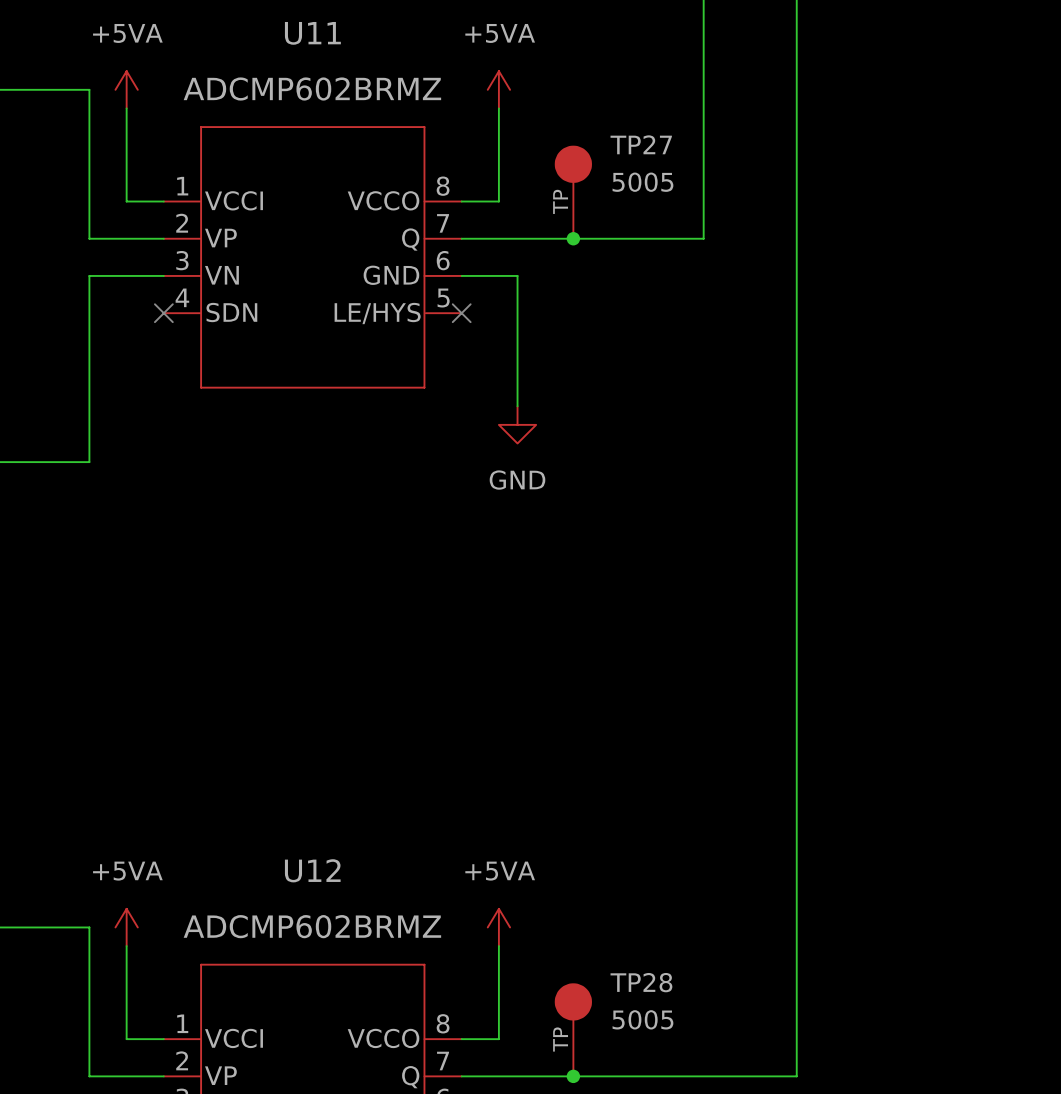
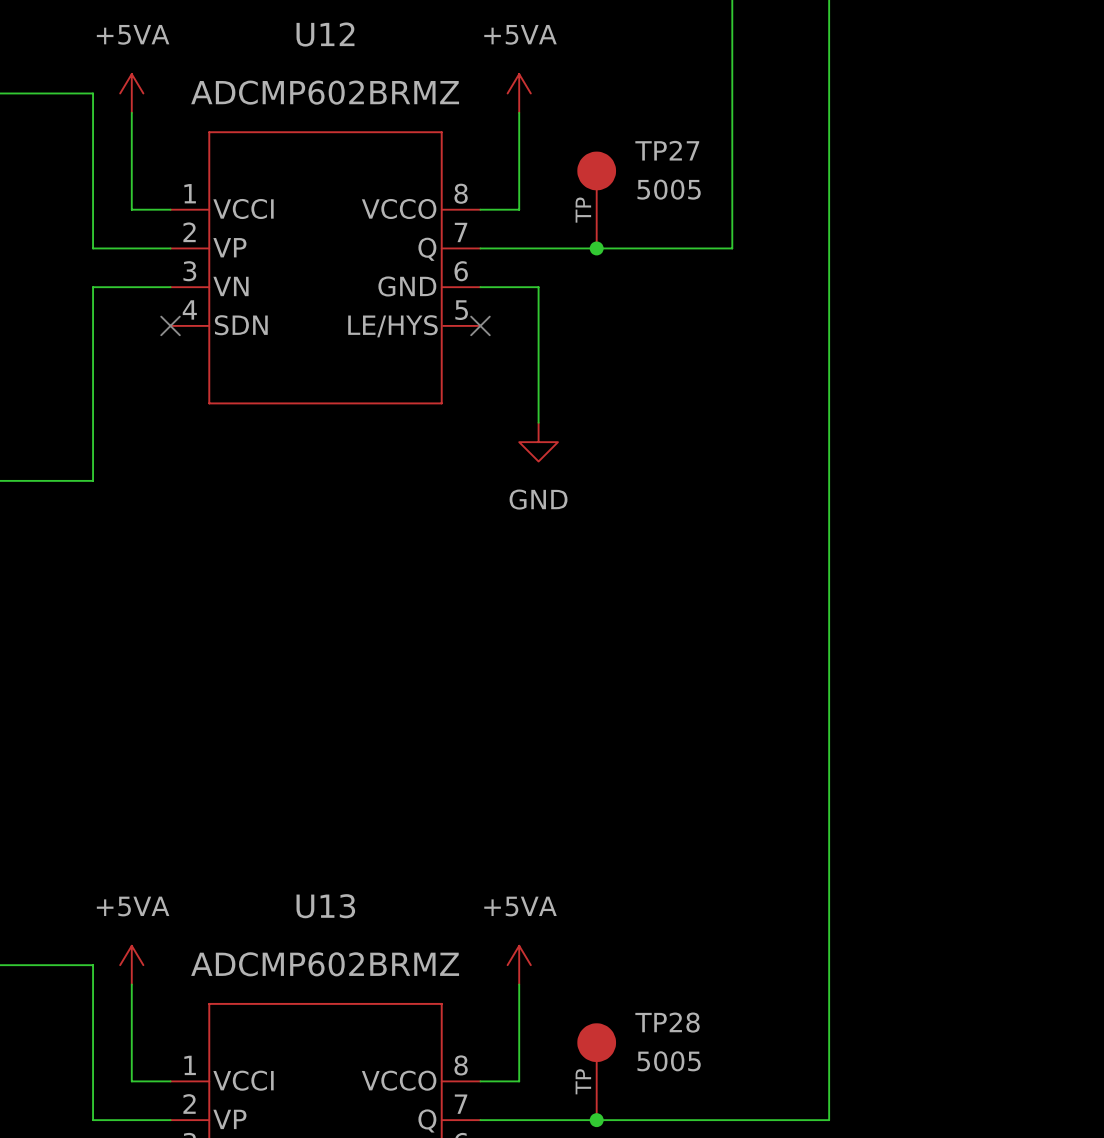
U11 name: U11 (312, 33) -> U12 (325, 34)
U12 name: U12 (312, 870) -> U13 (325, 906)

